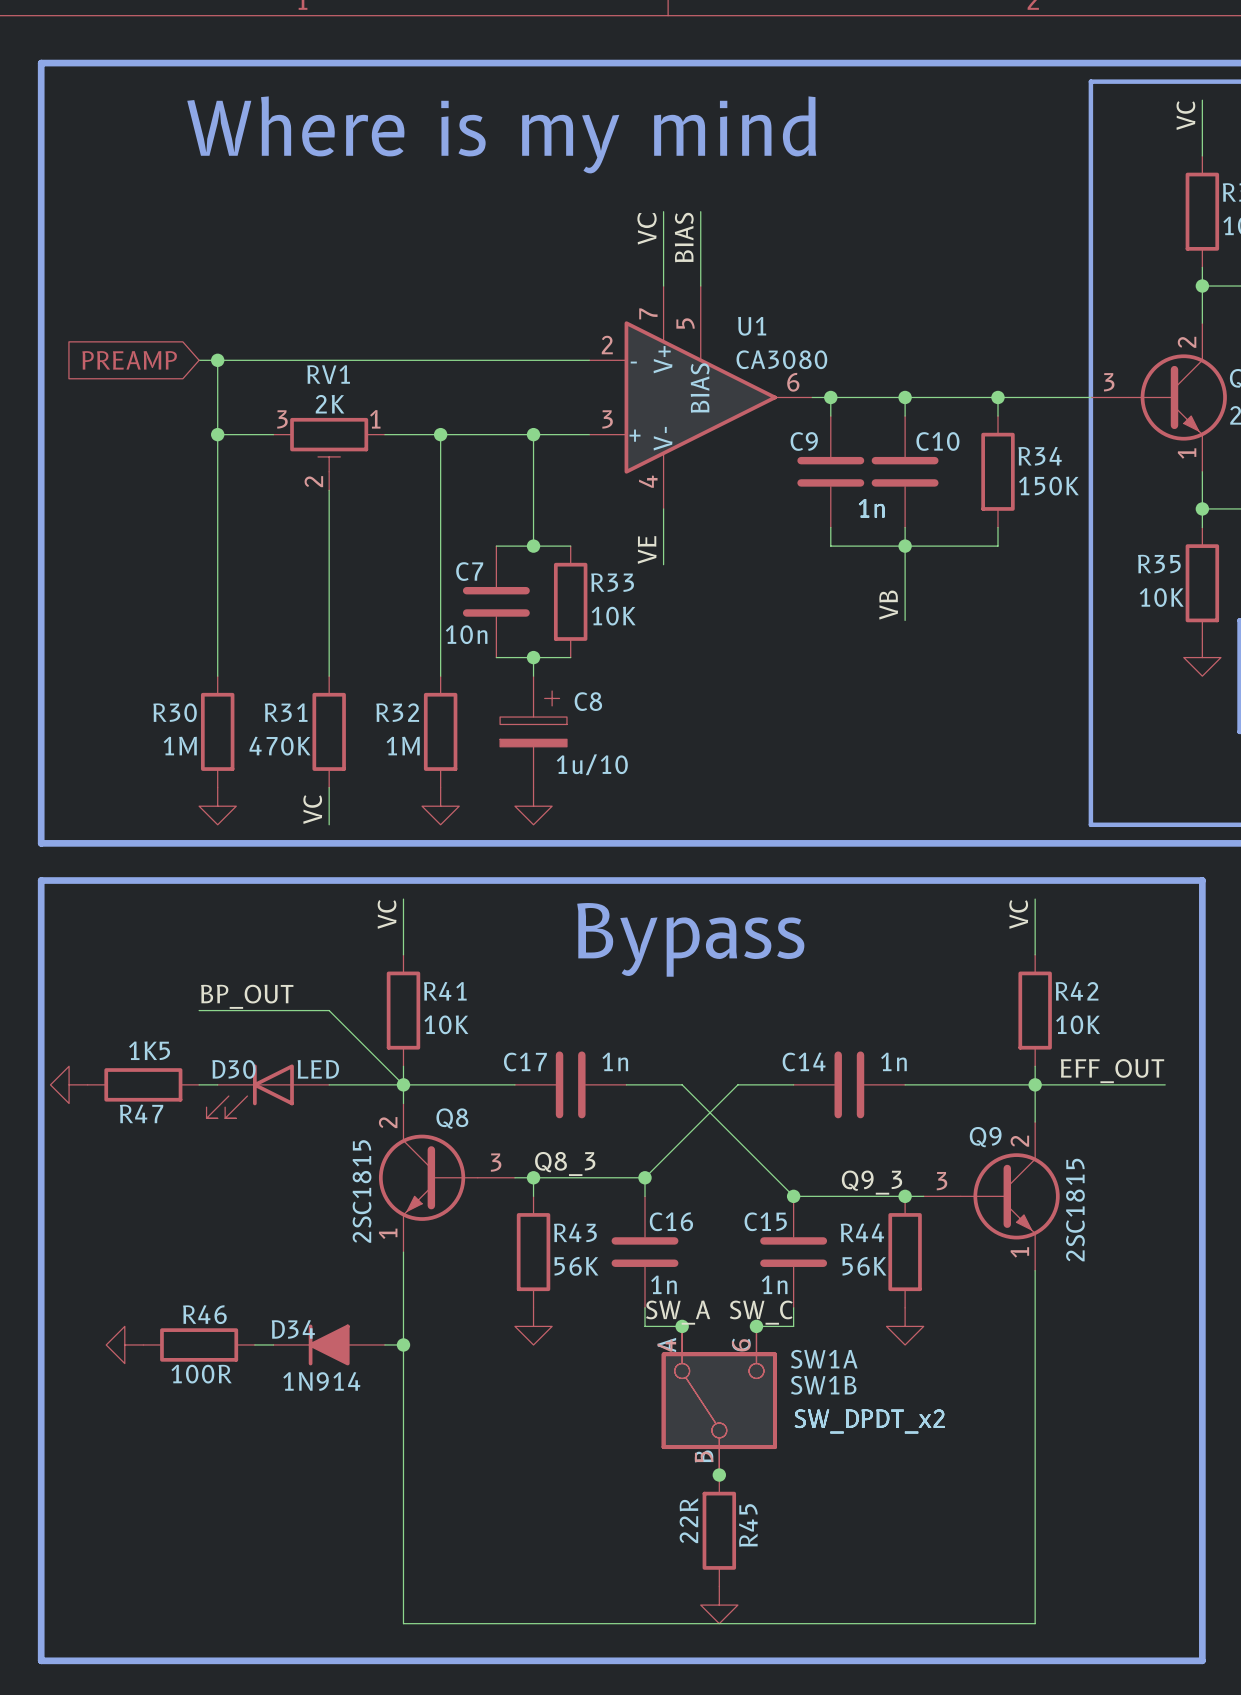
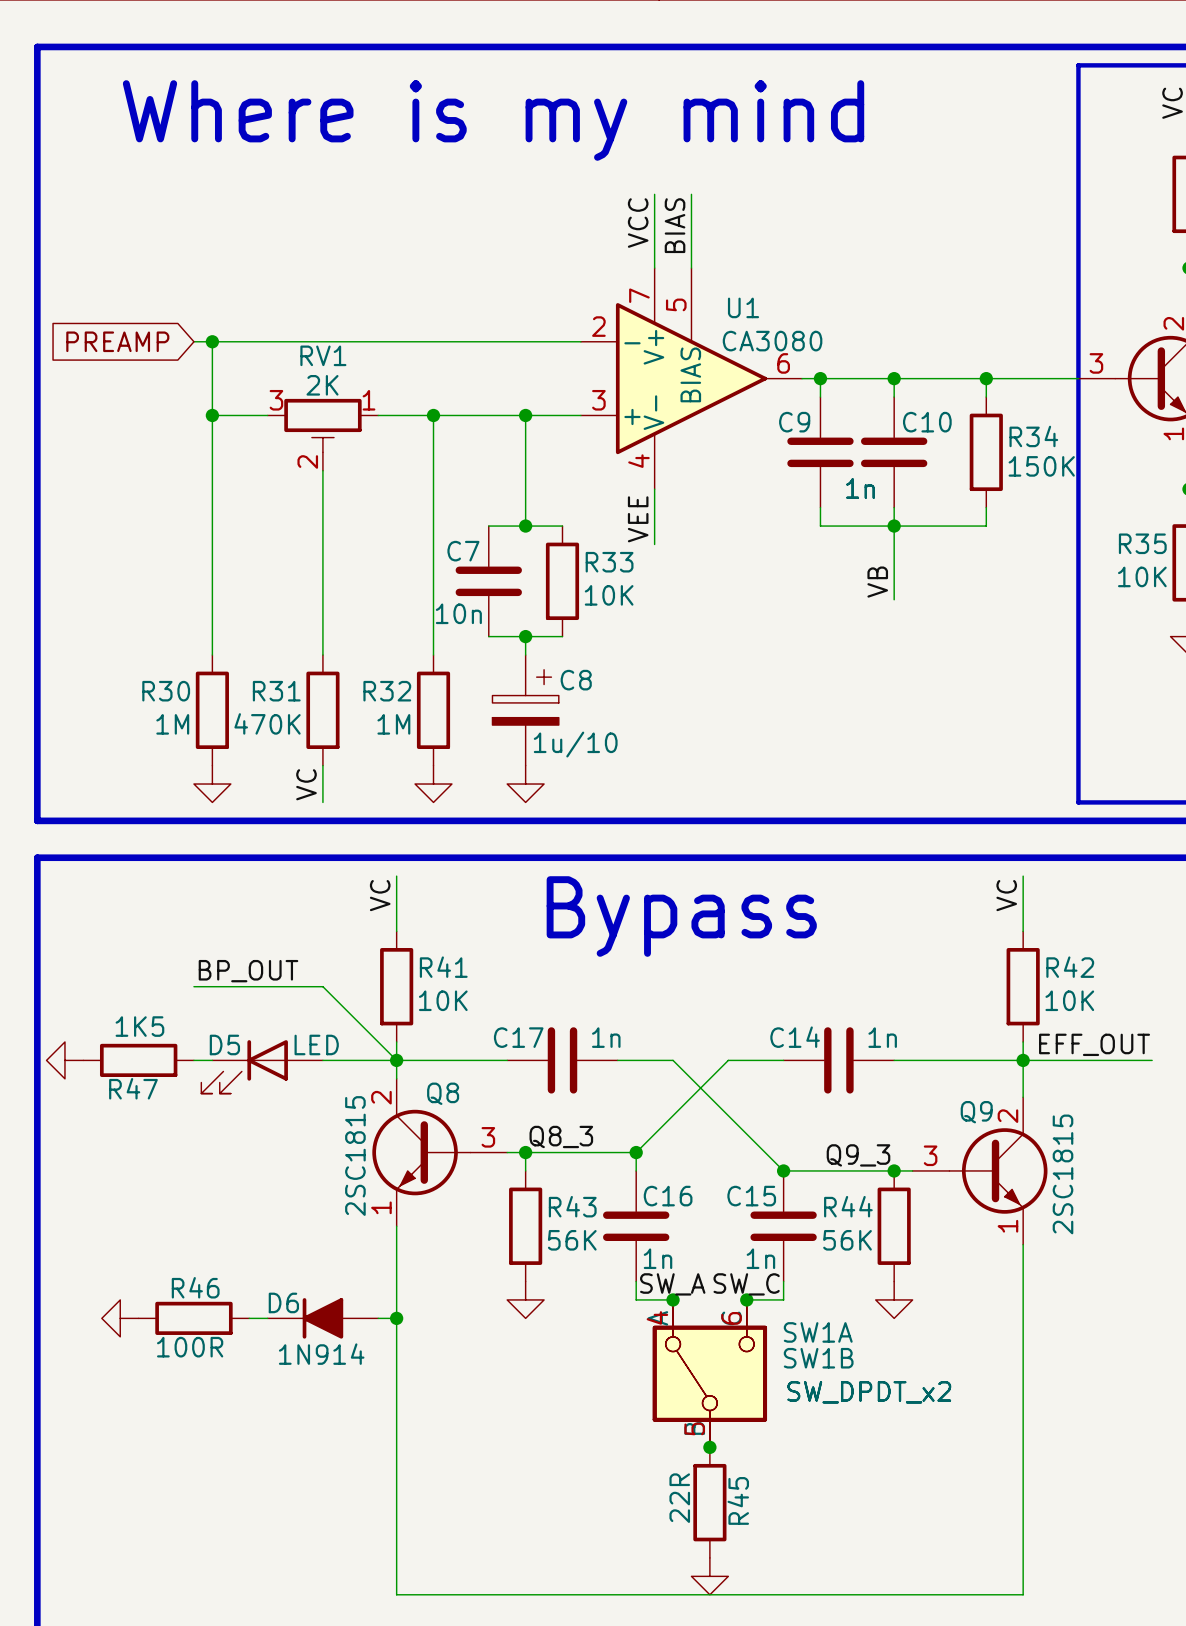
label: VС (647, 228) -> VCC (638, 223)
label: VE (647, 549) -> VEE (638, 519)
D30 name: D30 (233, 1069) -> D5 (224, 1044)
D34 name: D34 (293, 1329) -> D6 (283, 1302)

